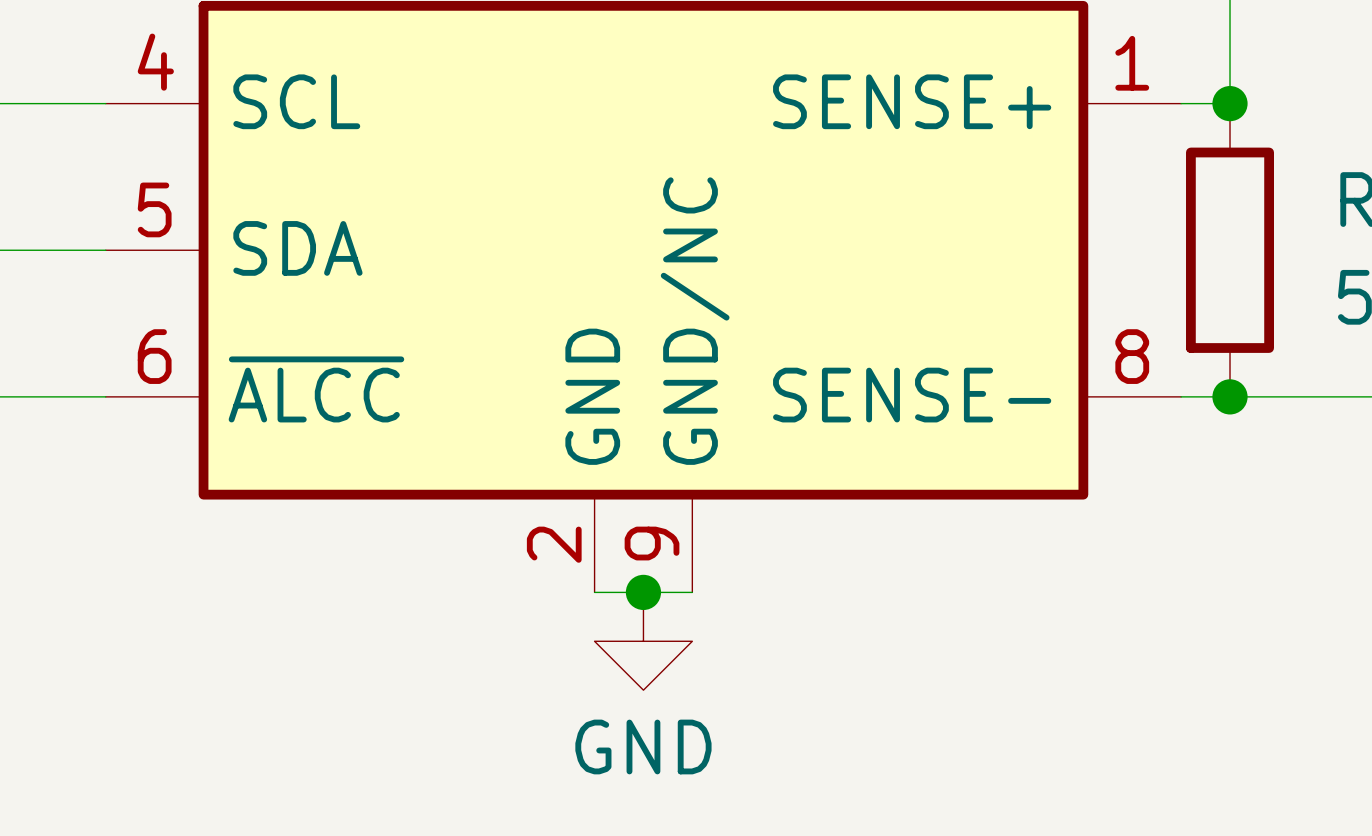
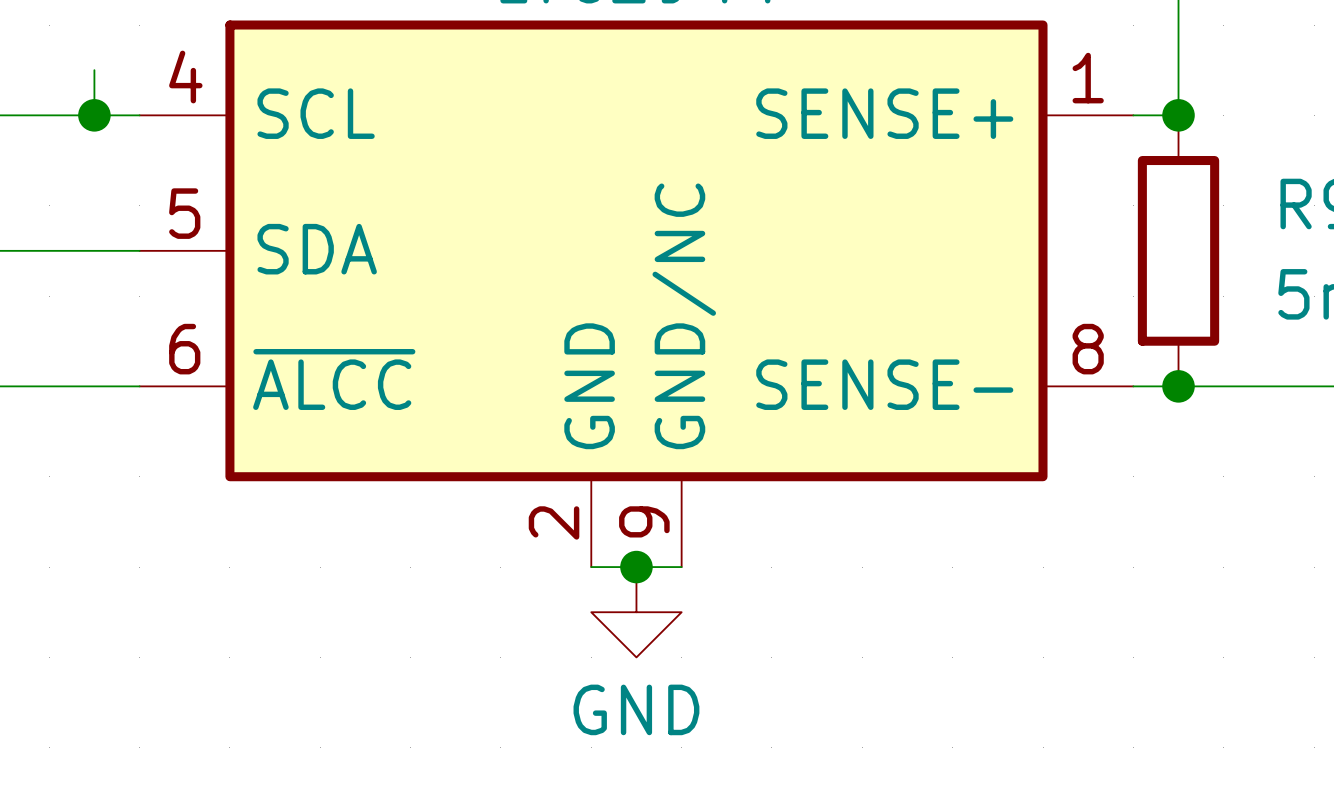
wire: none -> (94, 70) (94, 115)
junction: none -> (94, 115)

